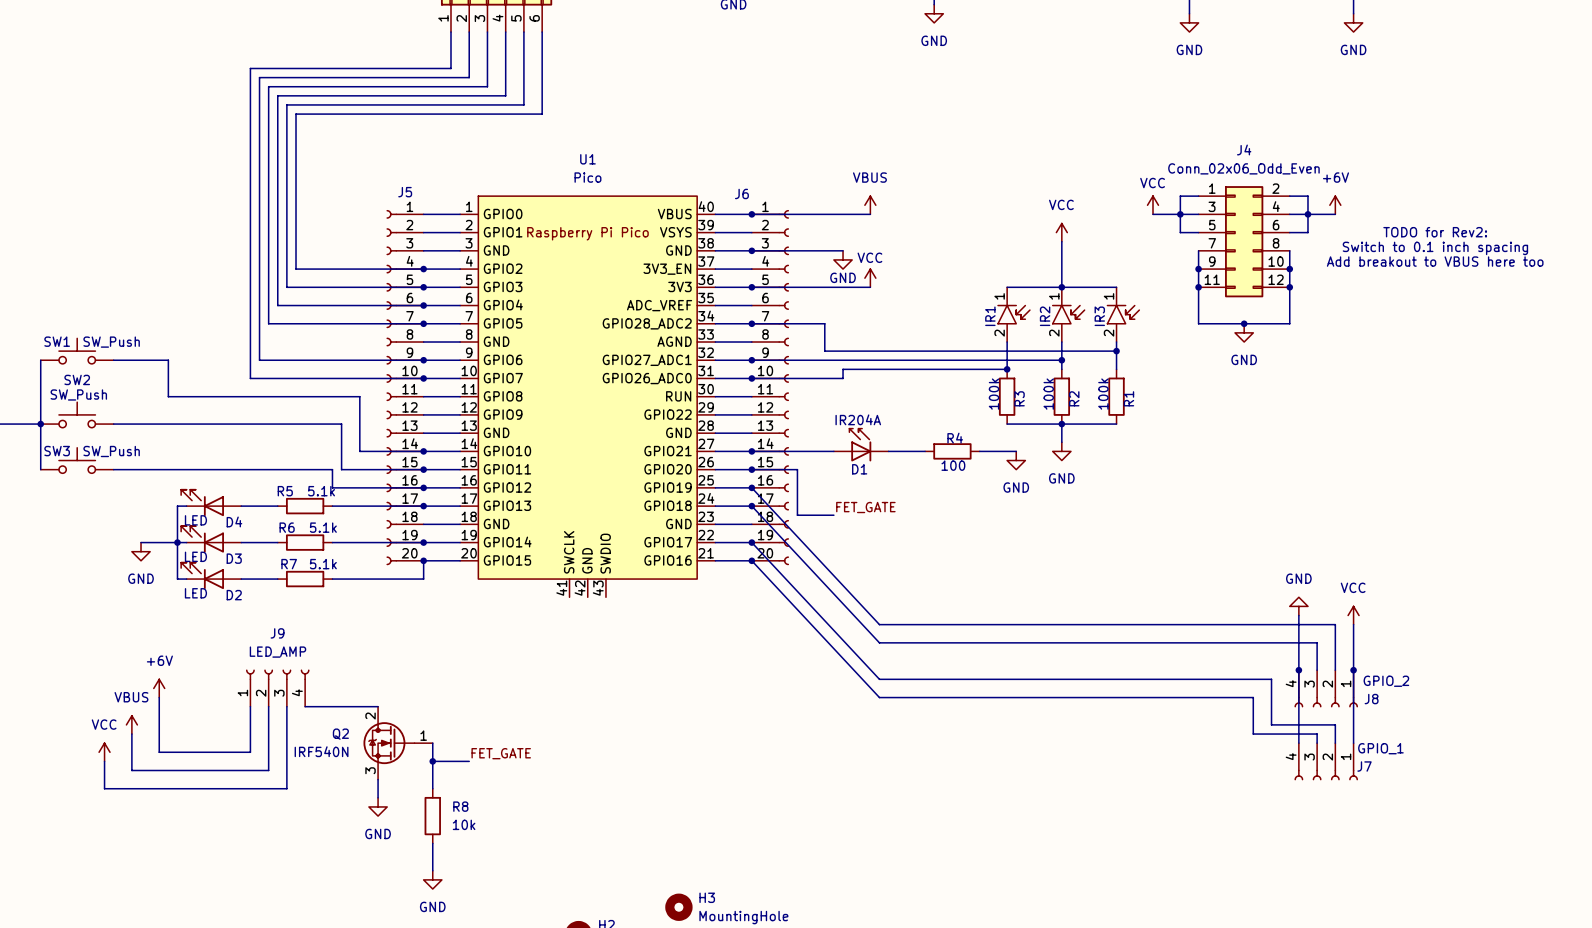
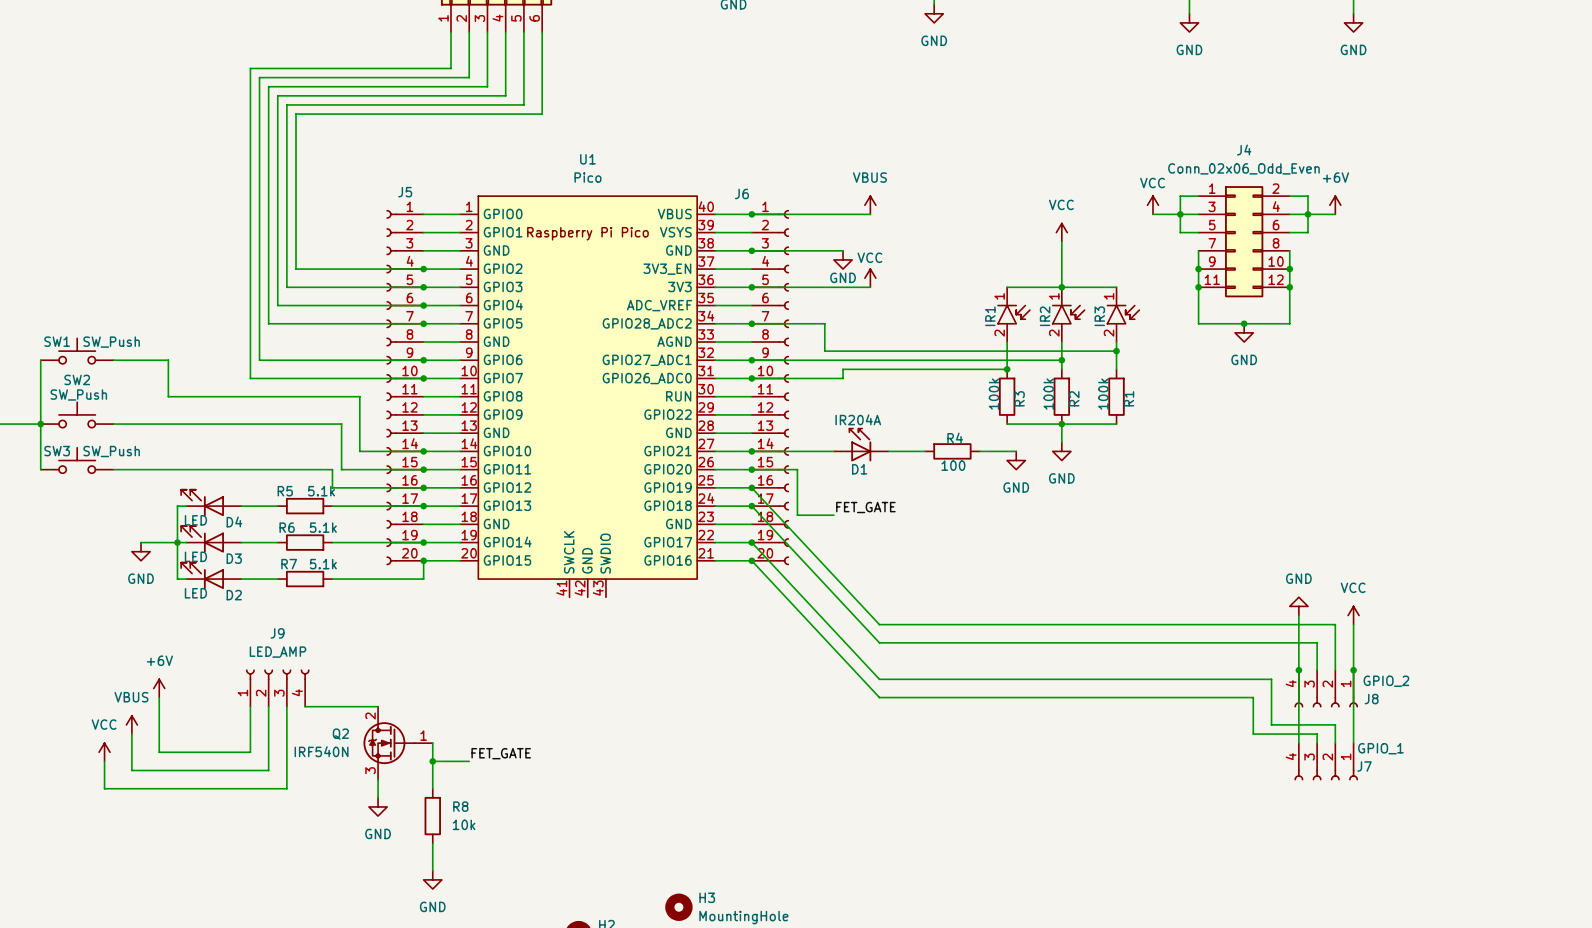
text: TODO for Rev2: (1435, 232) -> none
text: Switch to 0.1 inch spacing (1435, 248) -> none
text: Add breakout to VBUS here too (1435, 261) -> none

